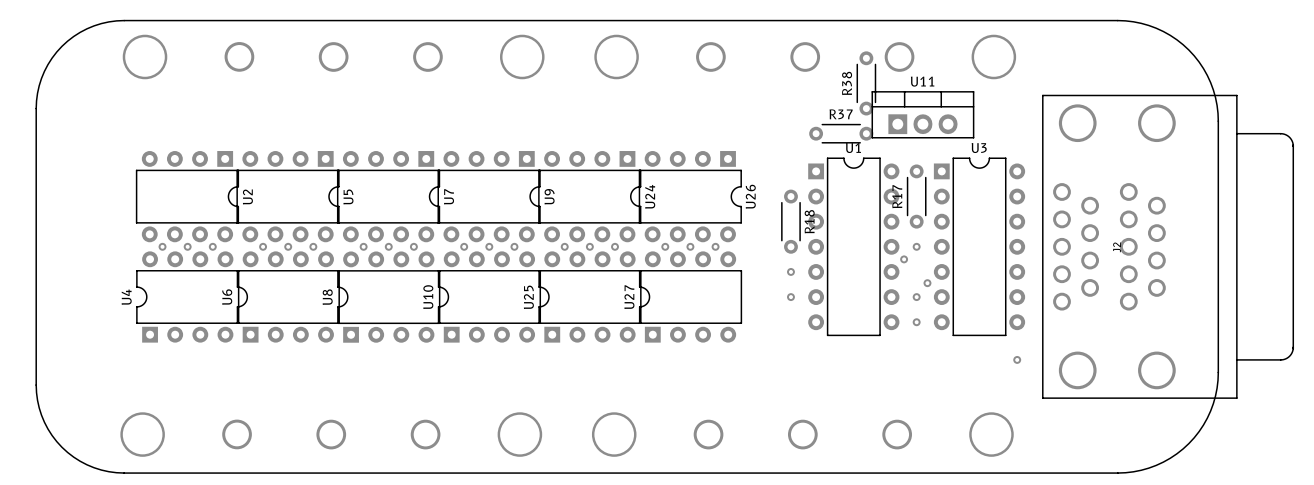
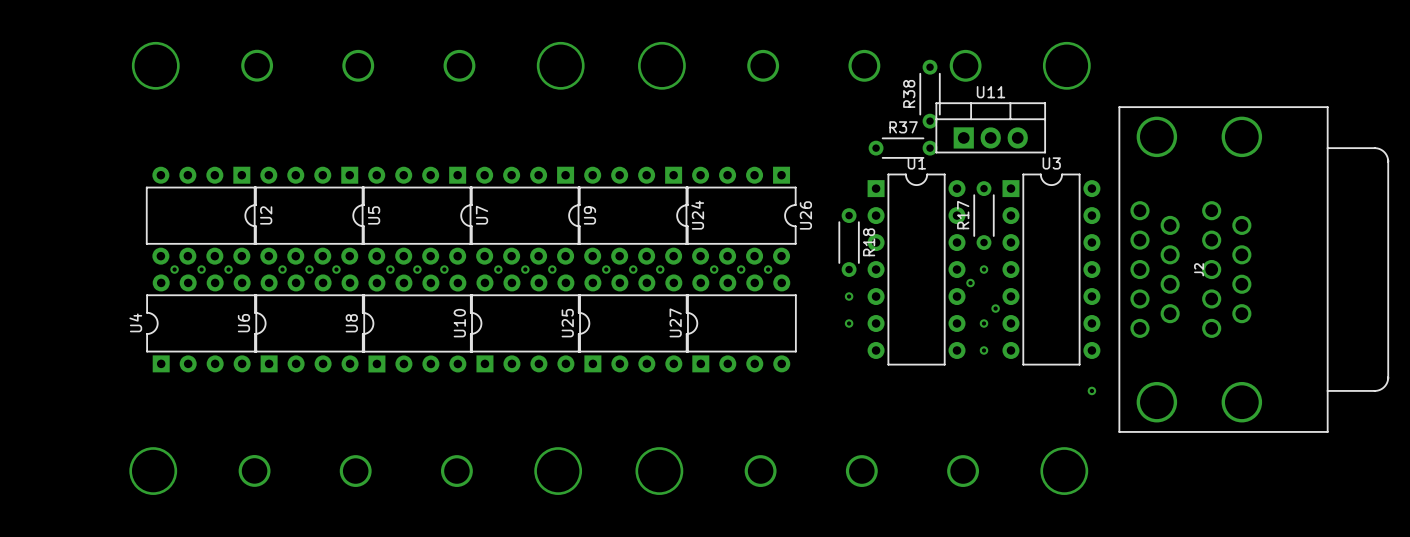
board edge: (124, 20) (1117, 20) (1148, 25) (1170, 35) (1194, 55) (1210, 82) (1217, 105) (1218, 372) (1213, 403) (1199, 431) (1176, 453) (1156, 465) (1125, 472) (124, 473) (94, 467) (73, 457) (56, 441) (44, 422) (37, 400) (36, 100) (44, 71) (61, 46) (73, 36) (94, 25) (124, 20) -> none

